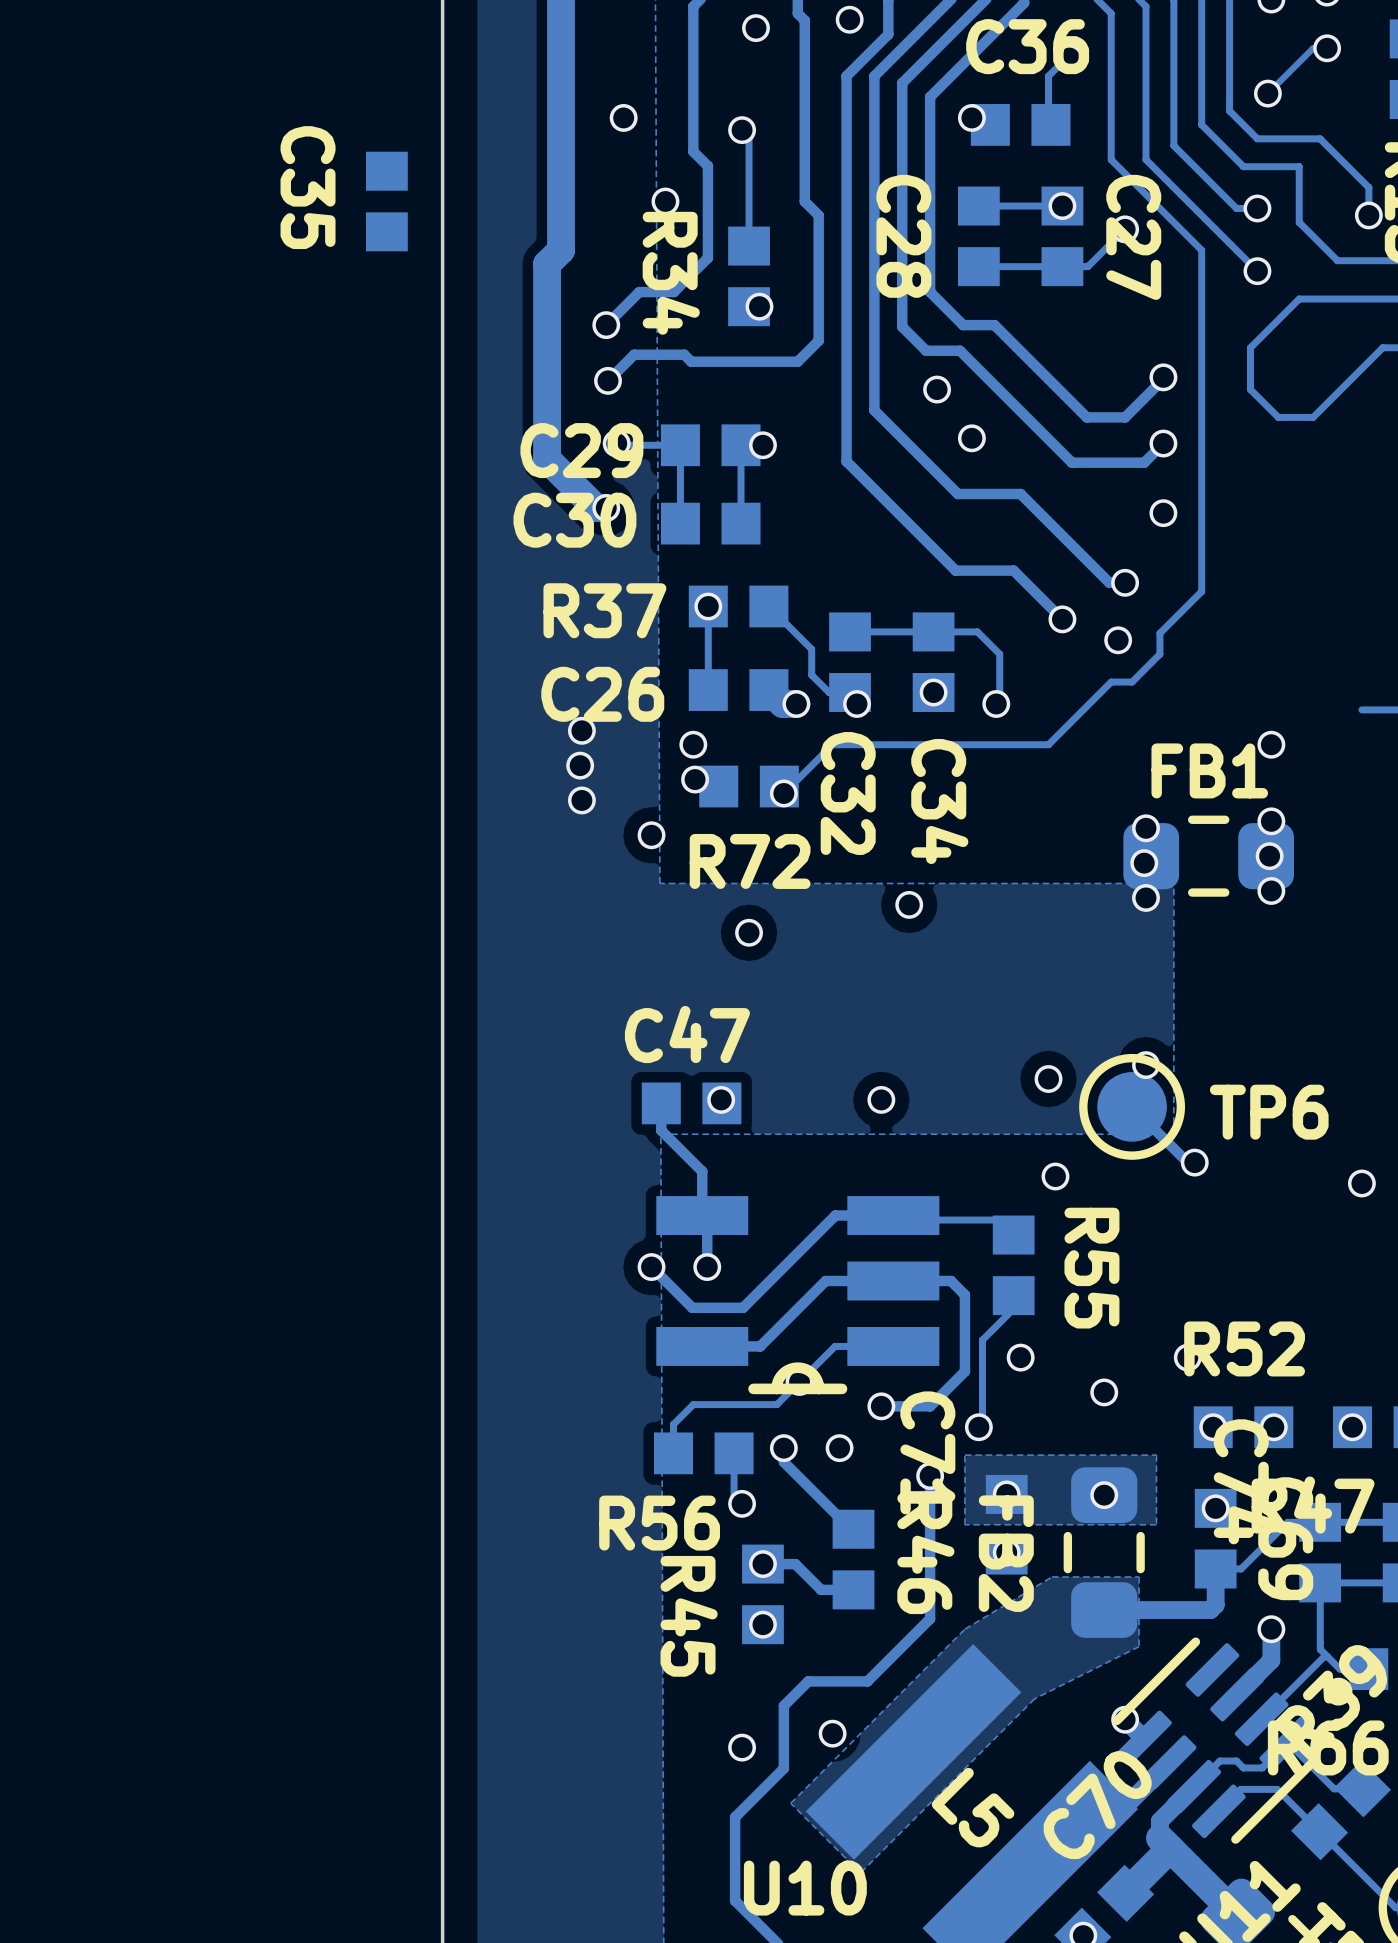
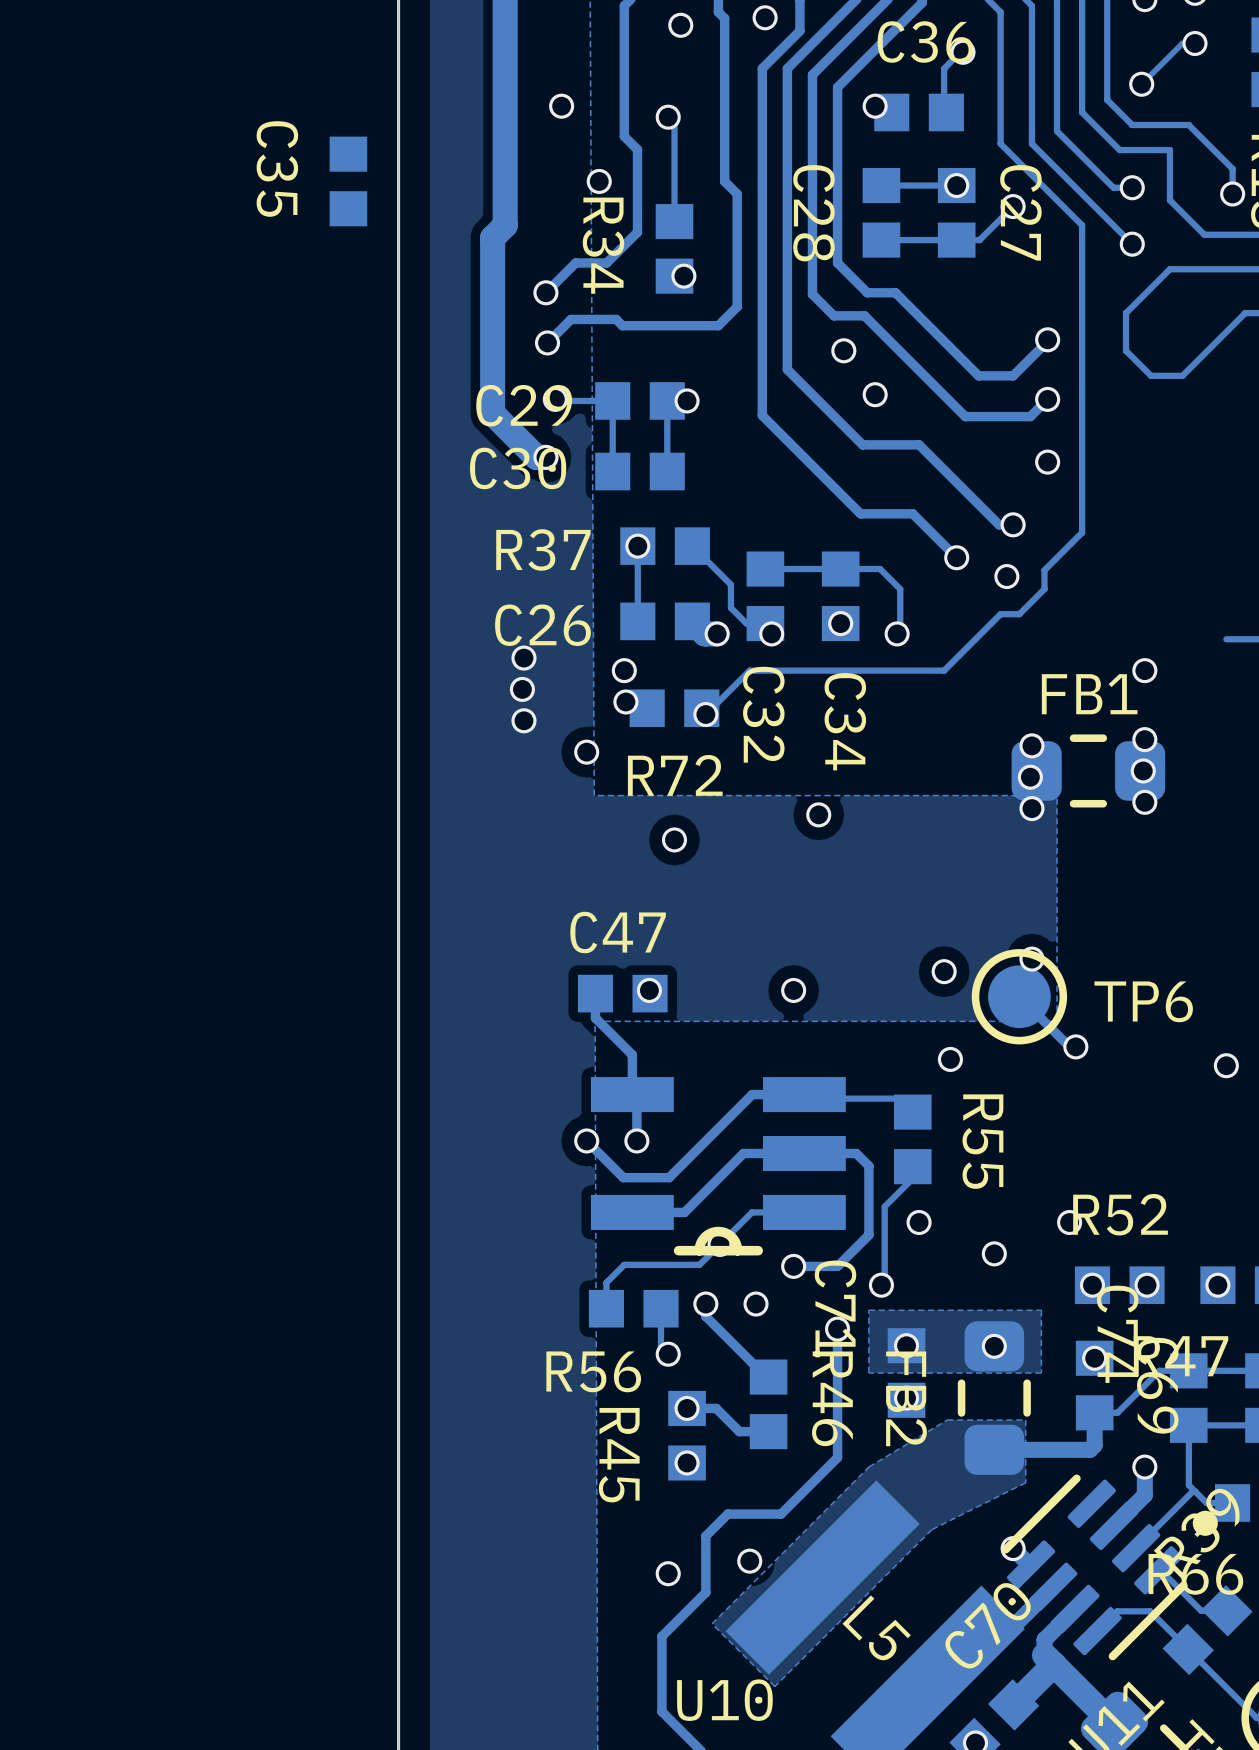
track: (1286, 1743) (1262, 1767) (1243, 1767) (1236, 1761) (1219, 1761) (1194, 1786) -> none

